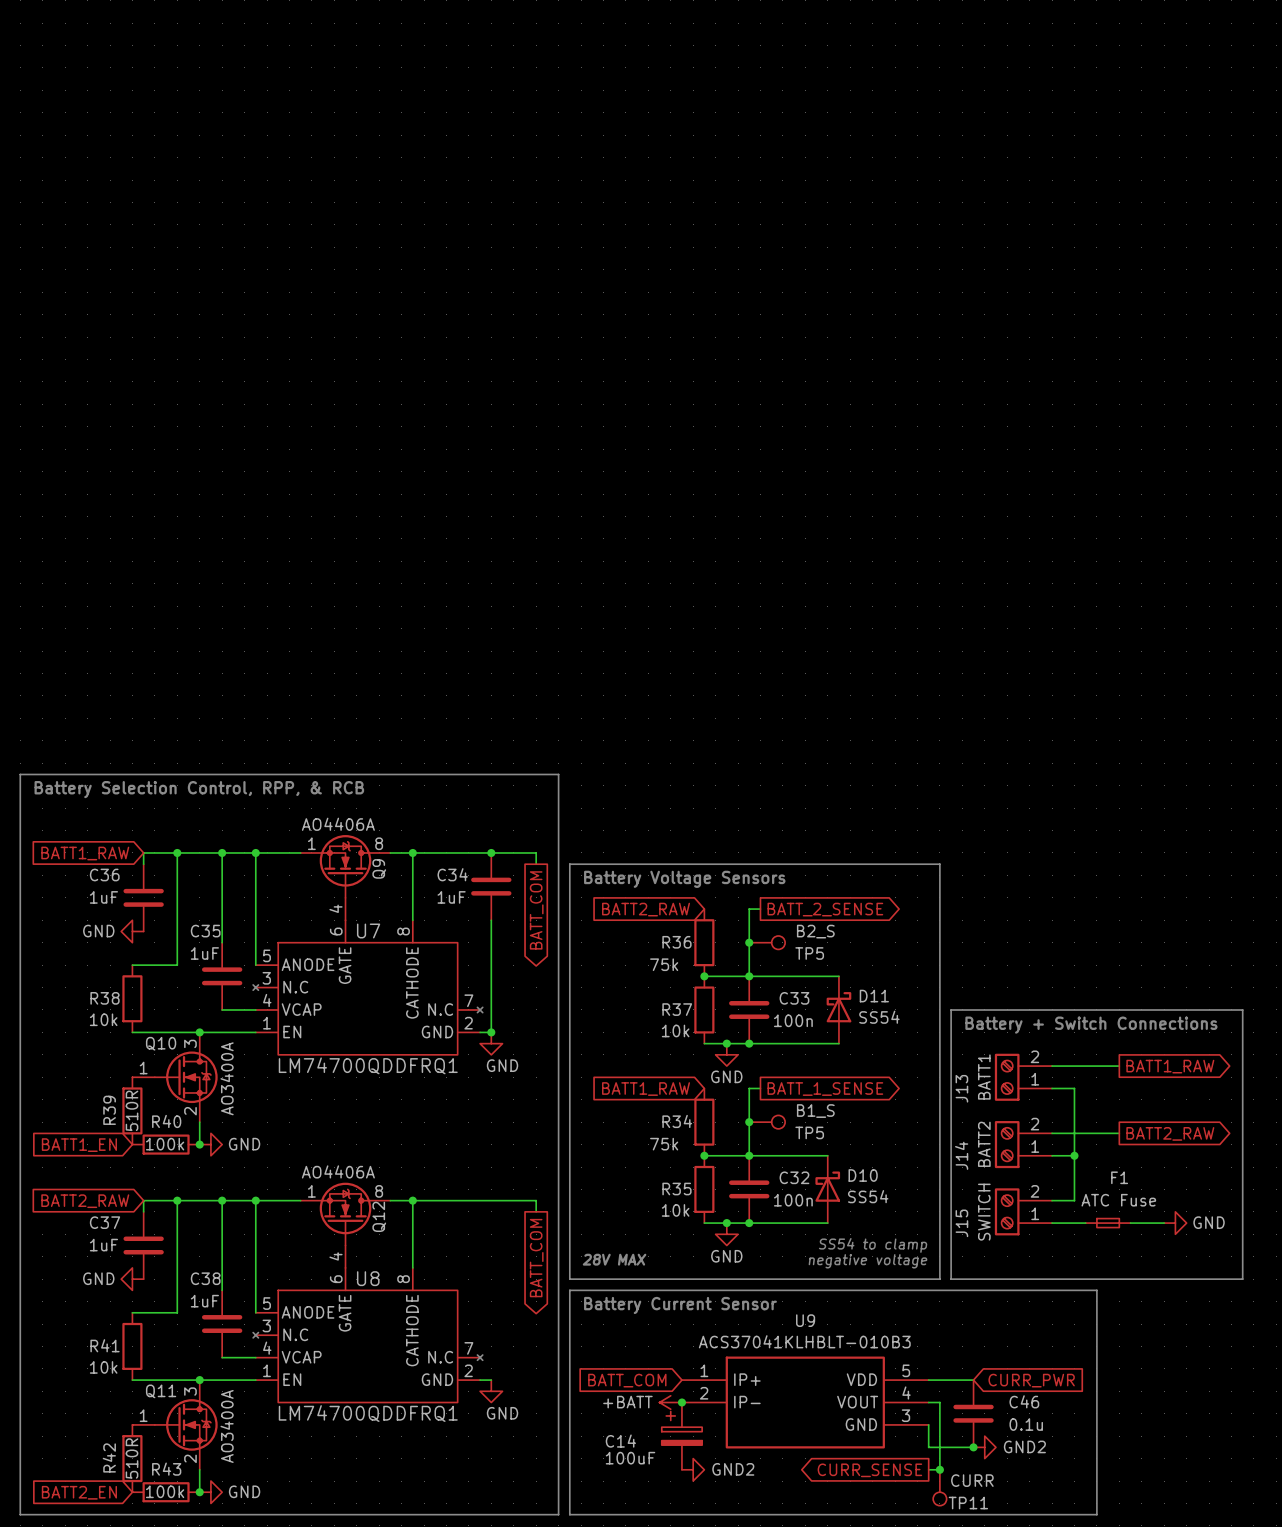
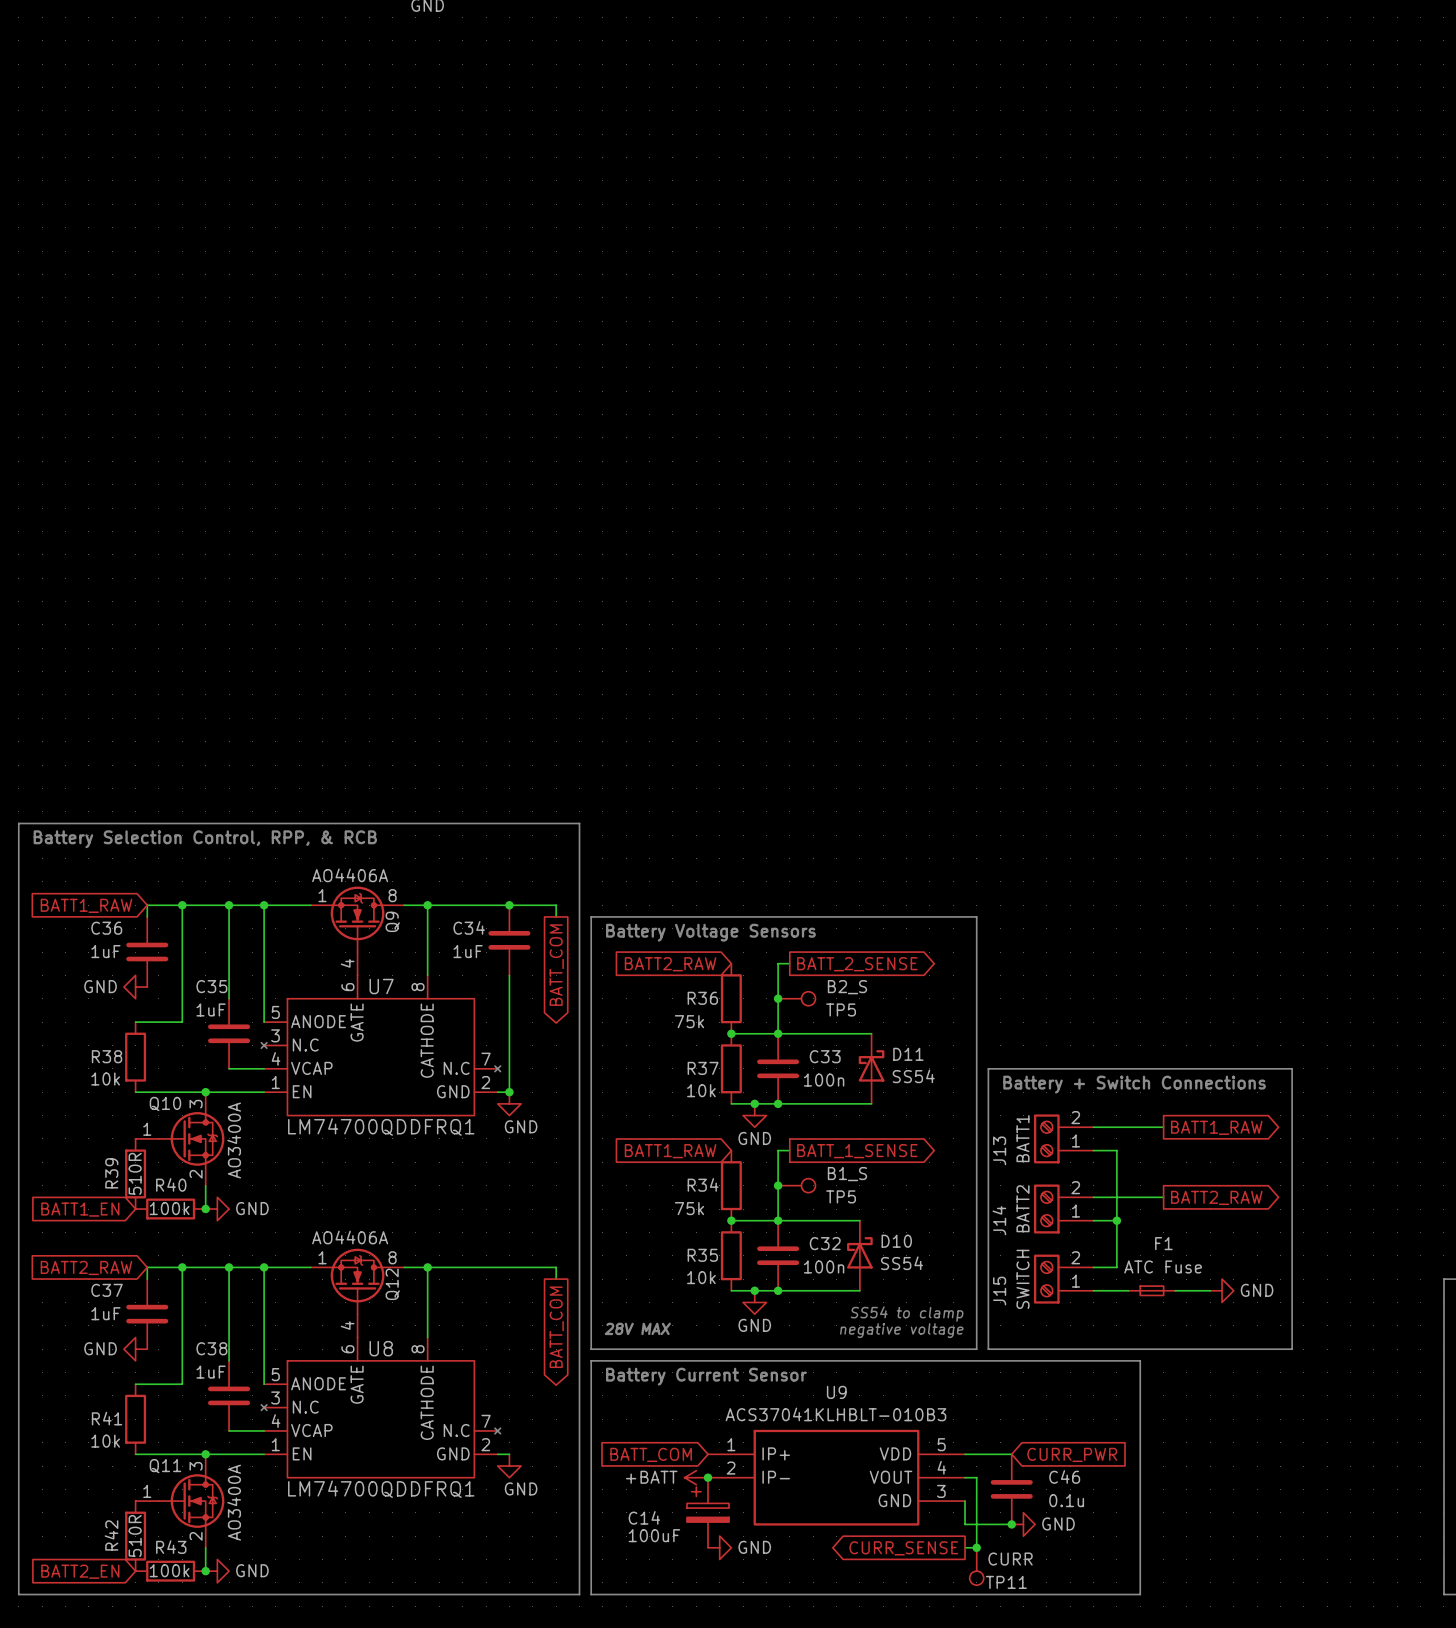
power symbol: GND2 (984, 1447) -> GND (1023, 1524)
power symbol: GND2 (693, 1469) -> GND (719, 1547)

